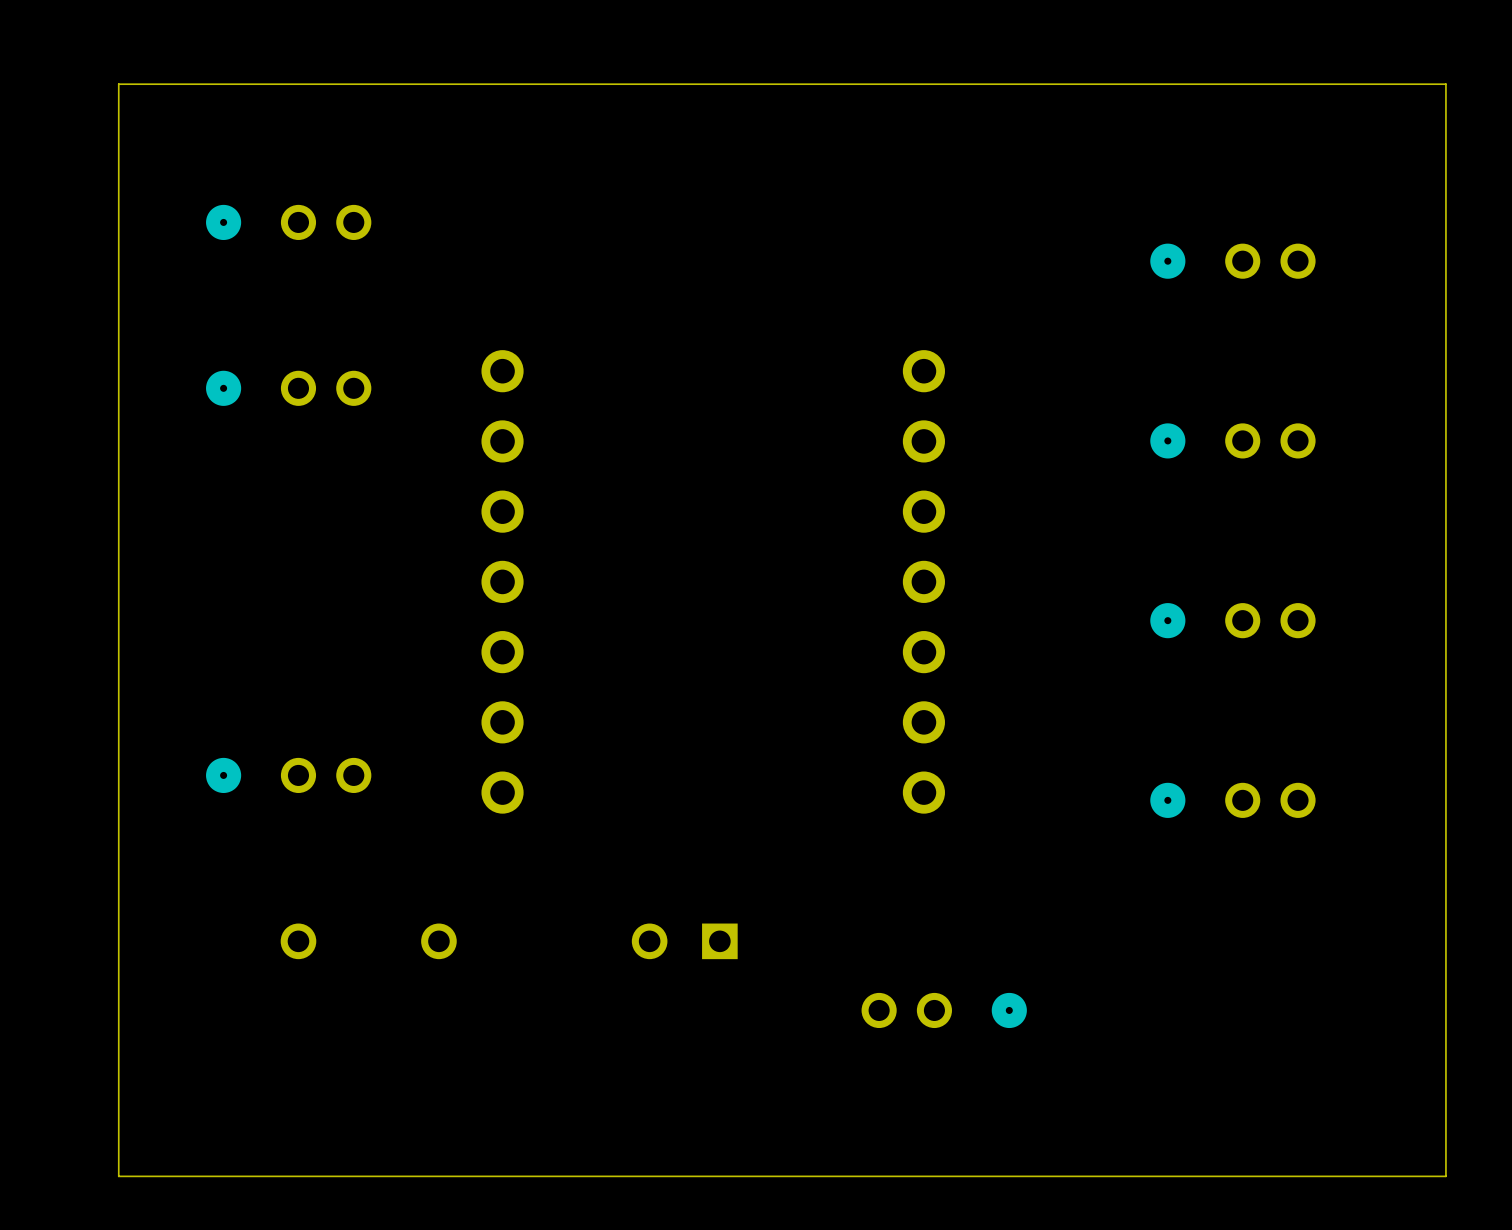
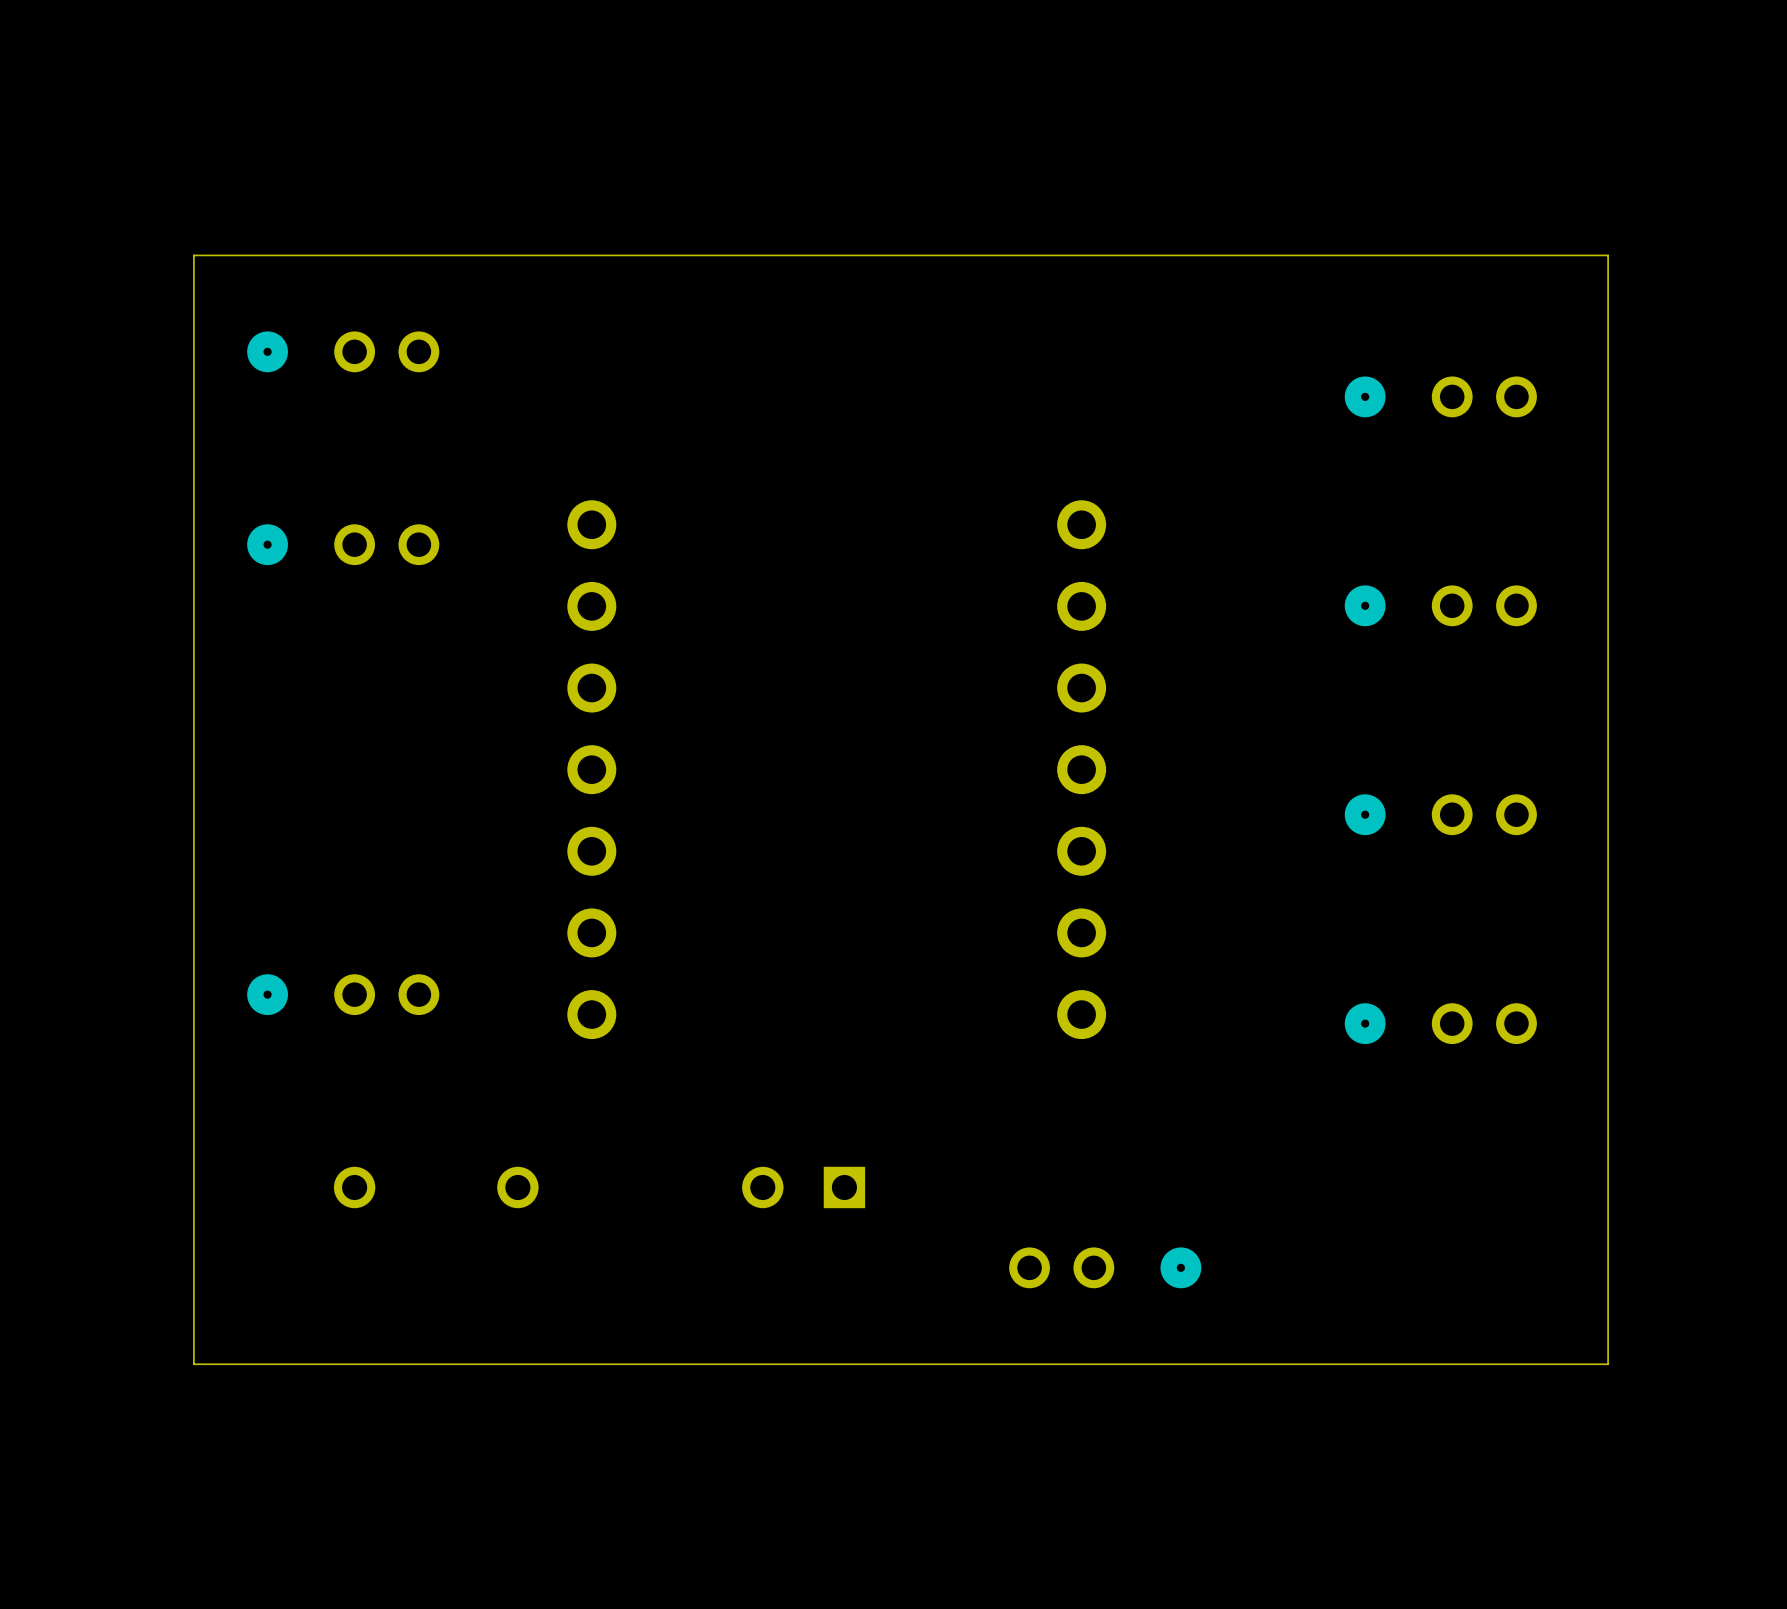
board edge: (1445, 84) (118, 84) (118, 1176) (1445, 1176) (1445, 84) -> (1608, 255) (1608, 1364) (193, 1364) (193, 255) (1608, 255)

